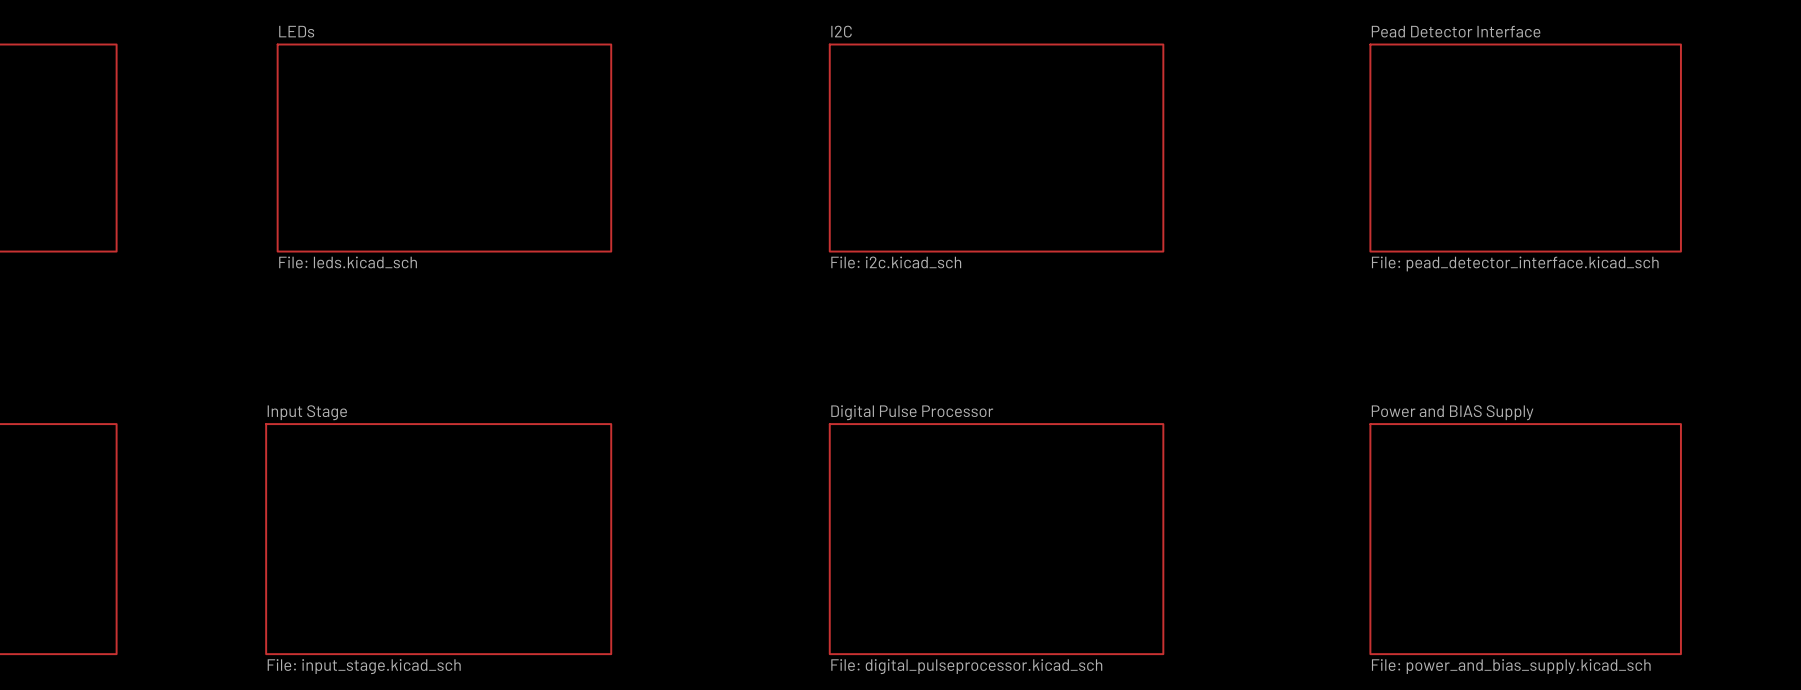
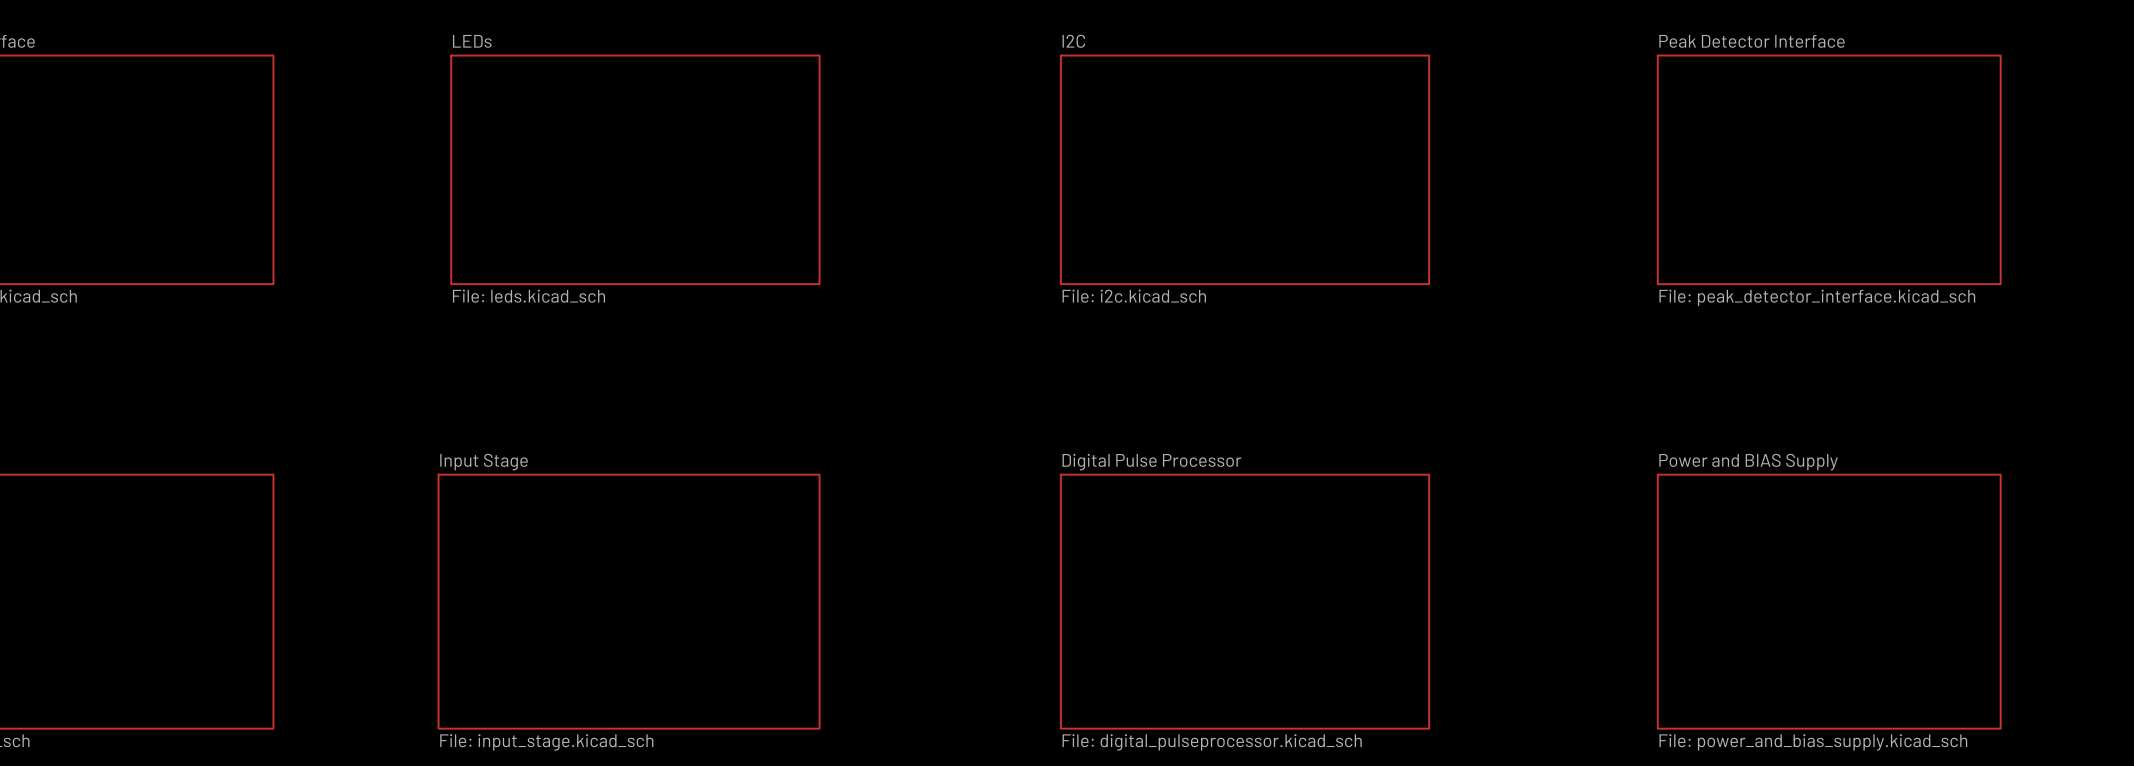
sheet Pead Detector Interface name: Pead Detector Interface (1456, 31) -> Peak Detector Interface (1751, 41)
sheet Pead Detector Interface value: File: pead_detector_interface.kicad_sch (1515, 263) -> File: peak_detector_interface.kicad_sch (1817, 297)

